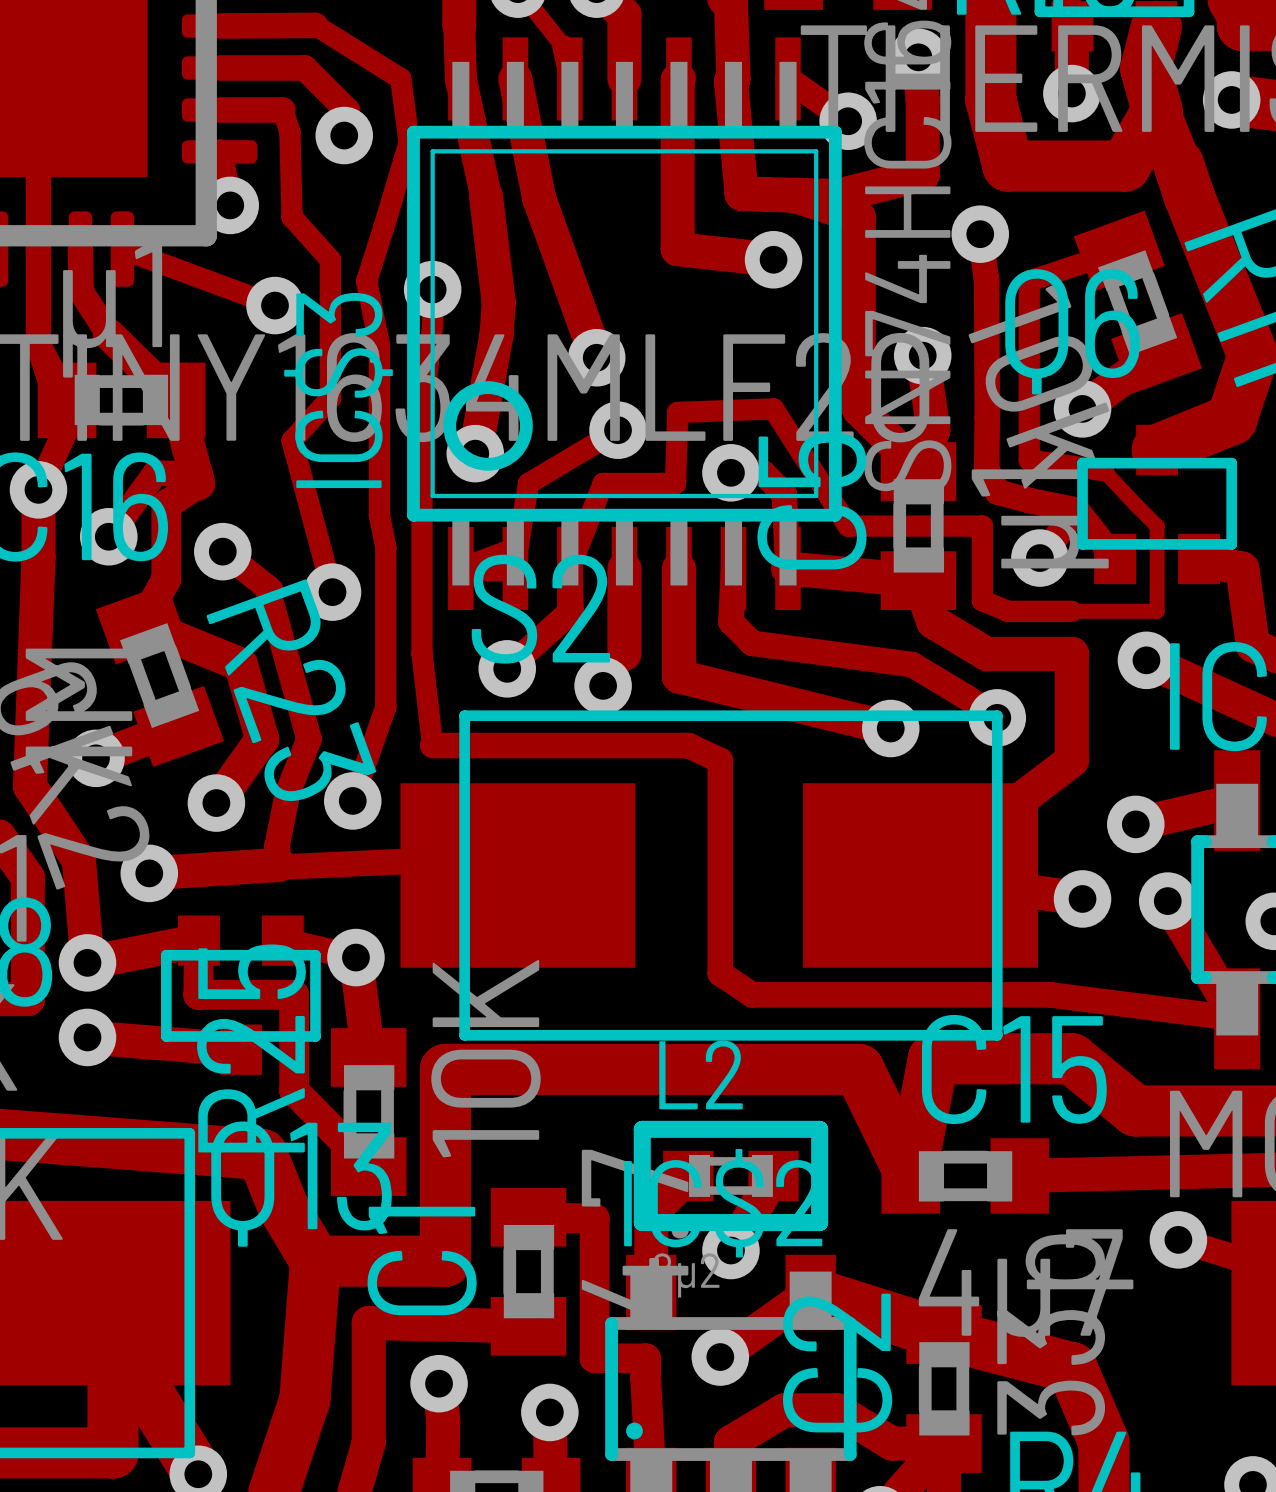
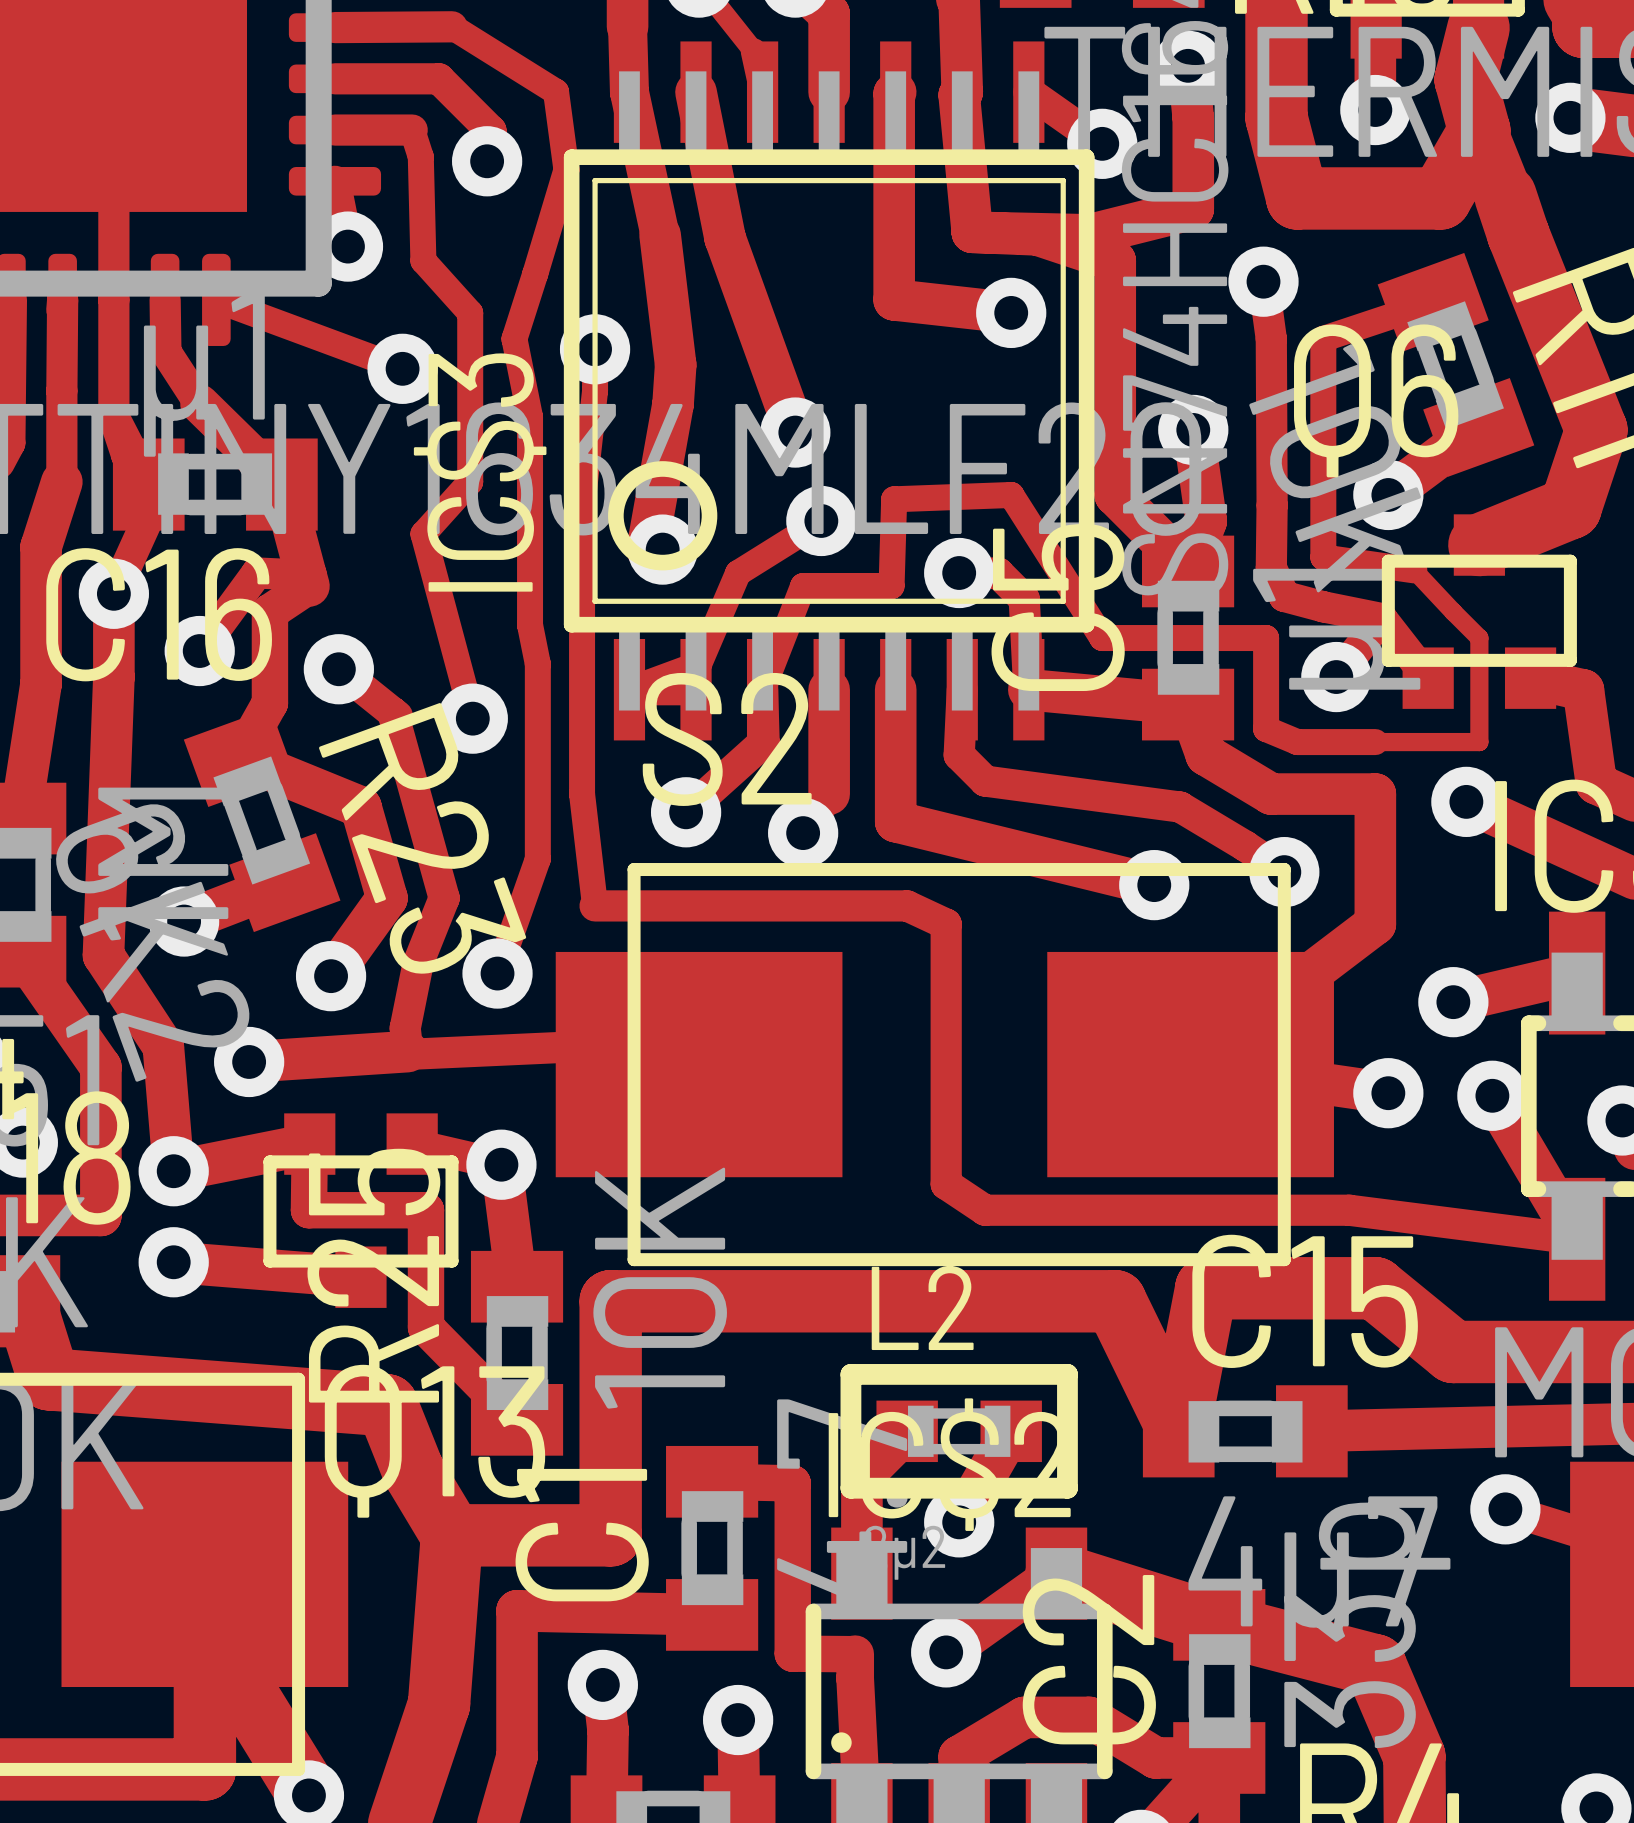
track: (618, 430) (528, 483) (517, 547) -> (821, 520) (738, 573) (699, 664)
via position: (475, 453) -> (662, 549)

